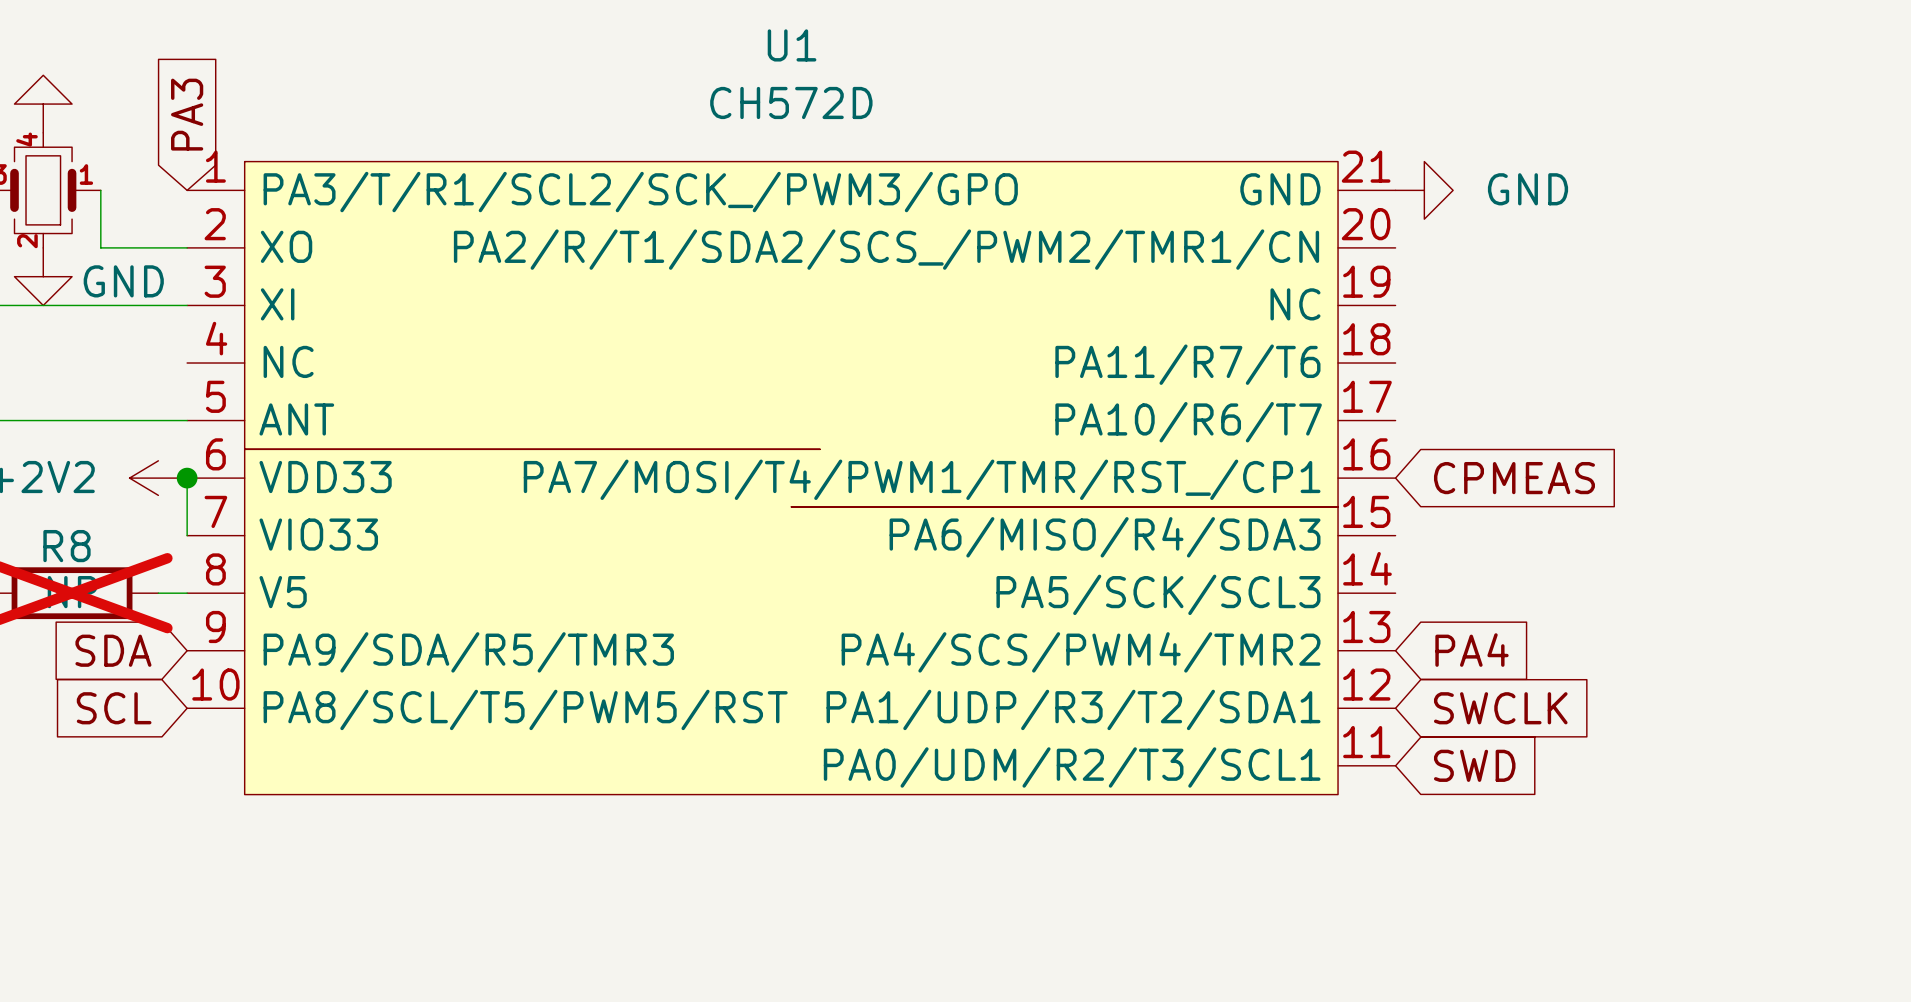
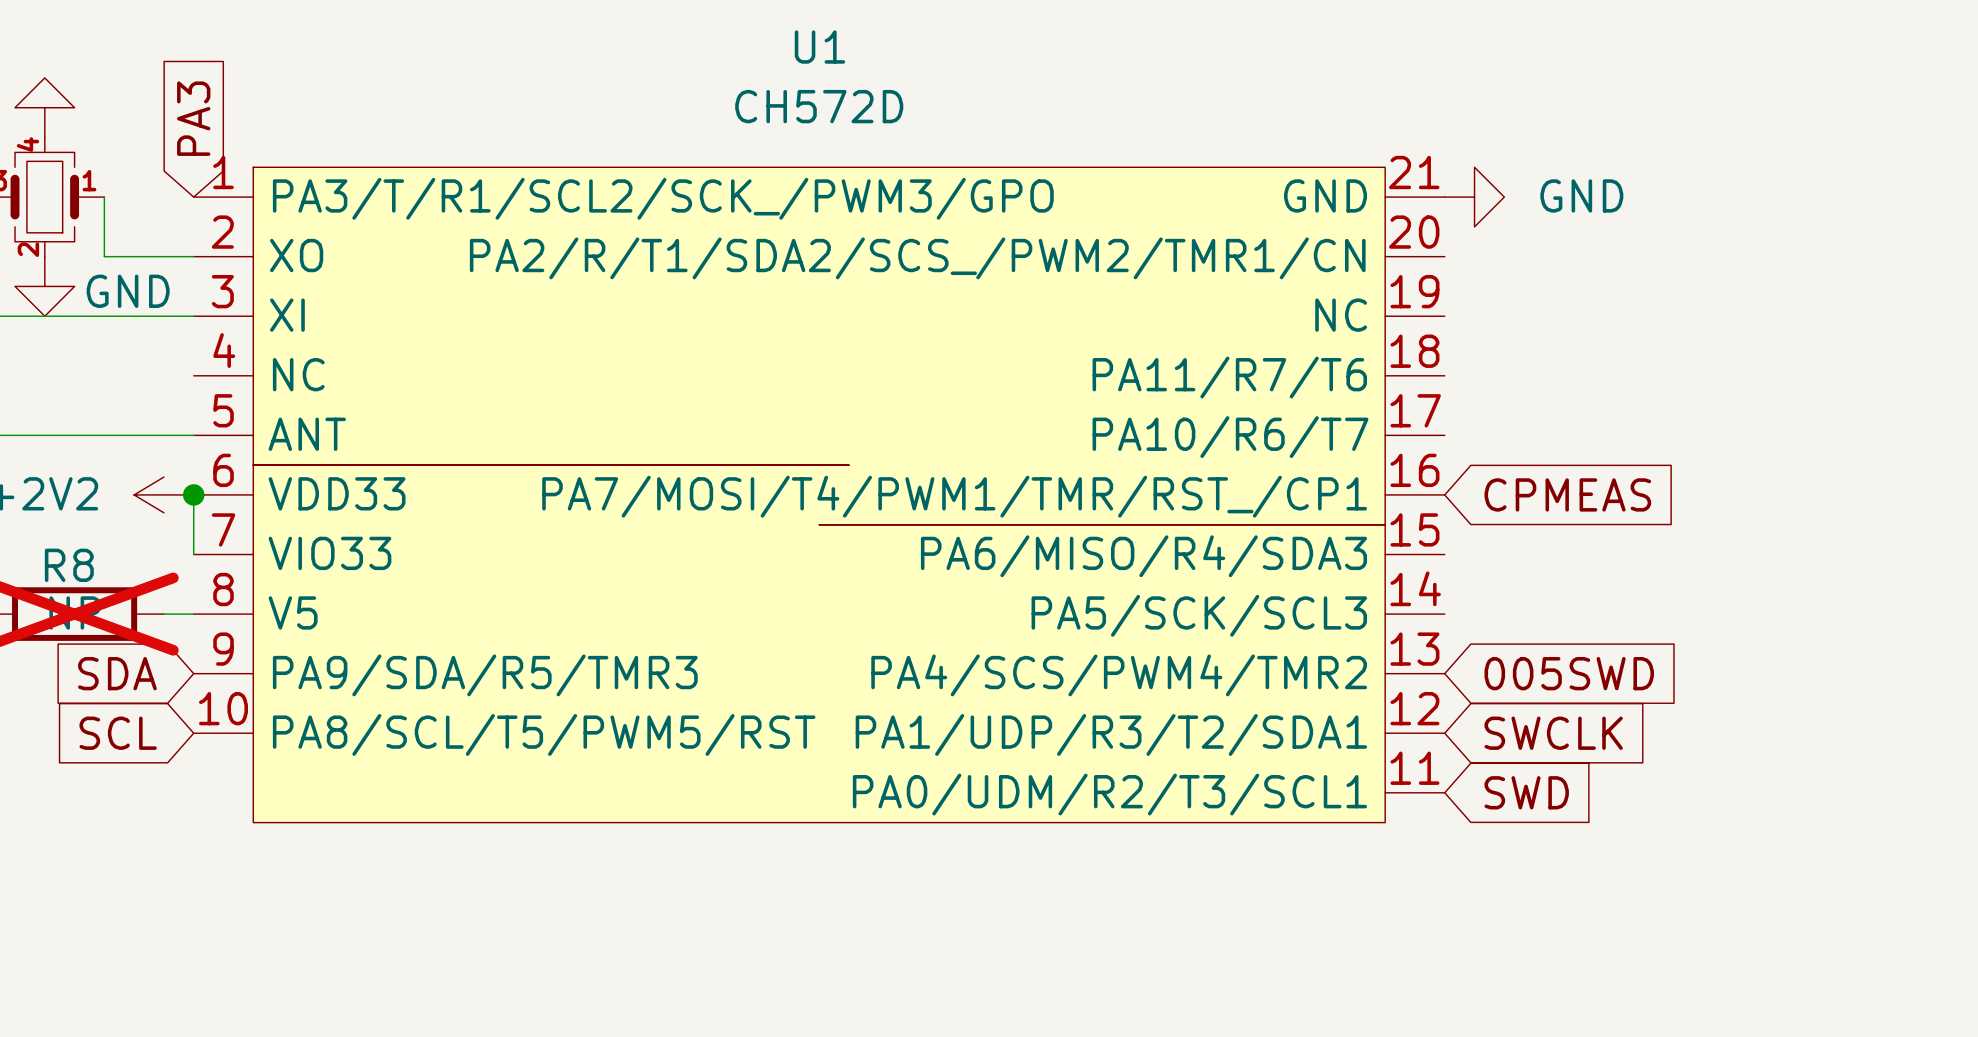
global label: PA4 (1472, 650) -> 005SWD (1569, 673)

